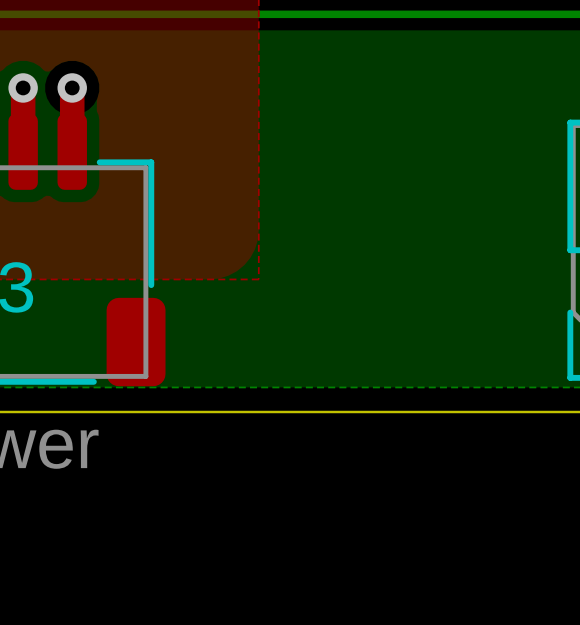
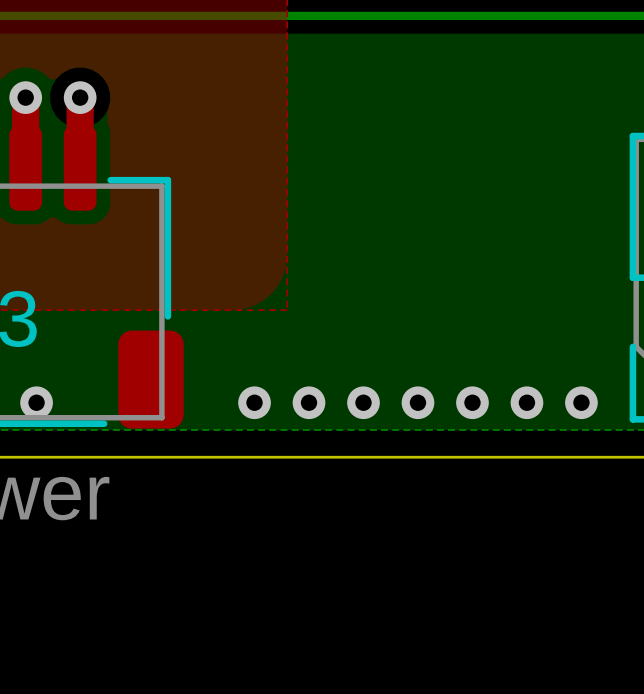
via: none -> (36, 402)
via: none -> (254, 402)
via: none -> (309, 402)
via: none -> (363, 402)
via: none -> (417, 402)
via: none -> (472, 402)
via: none -> (526, 402)
via: none -> (581, 402)

